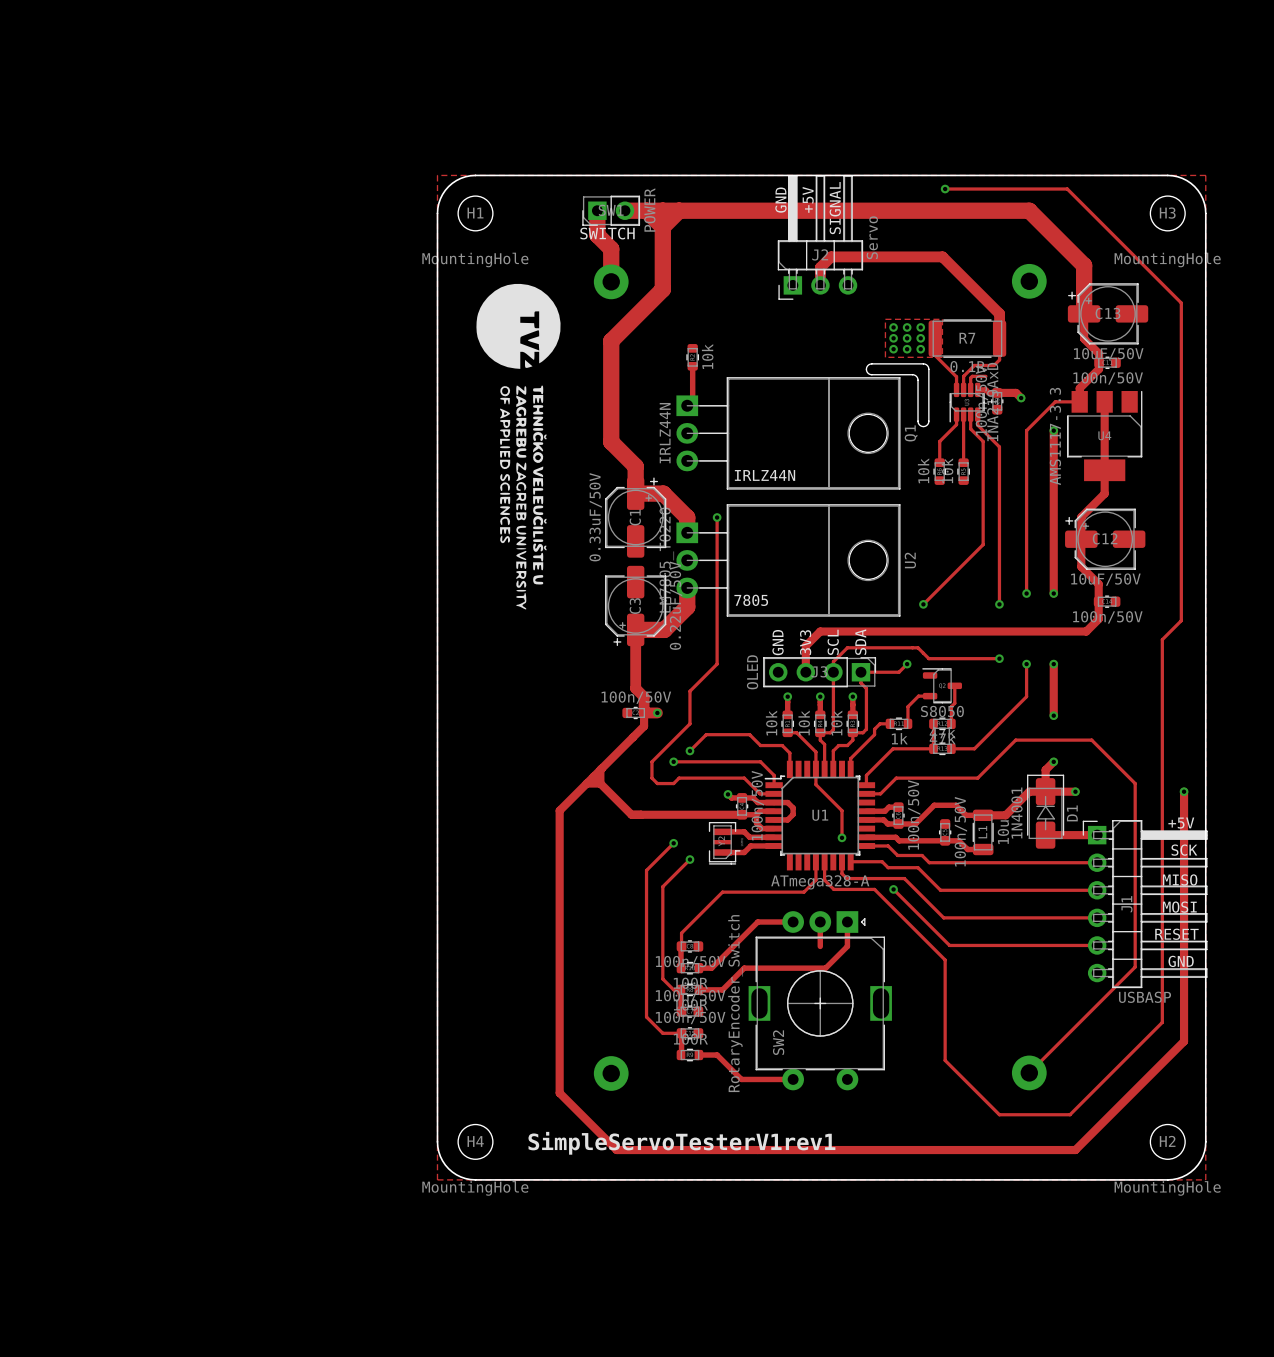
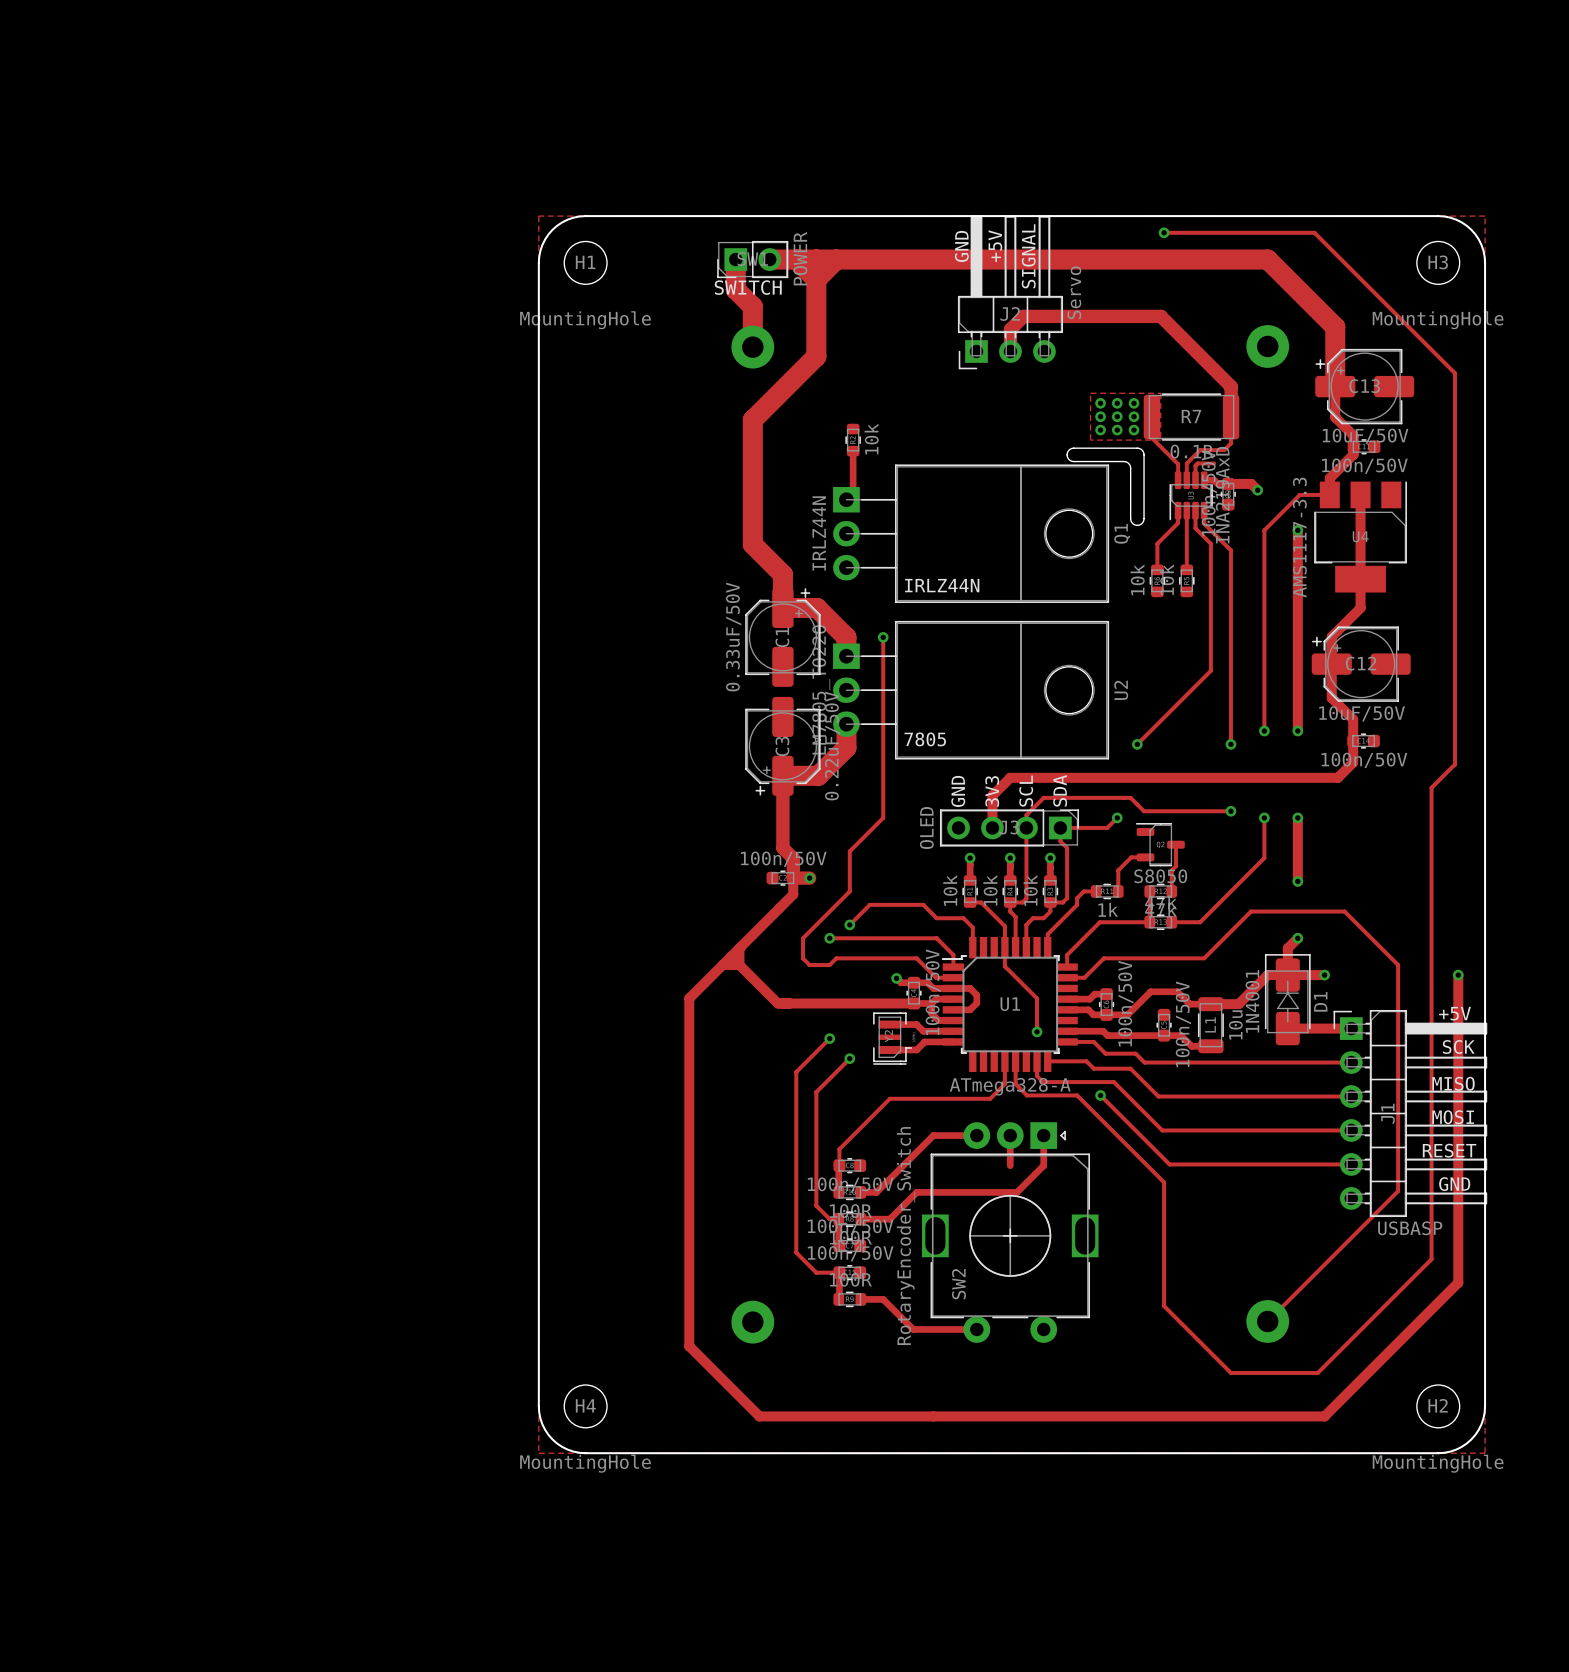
drawing: [476, 283, 561, 610] -> none
text: SimpleServoTesterV1rev1 (681, 1143) -> none

